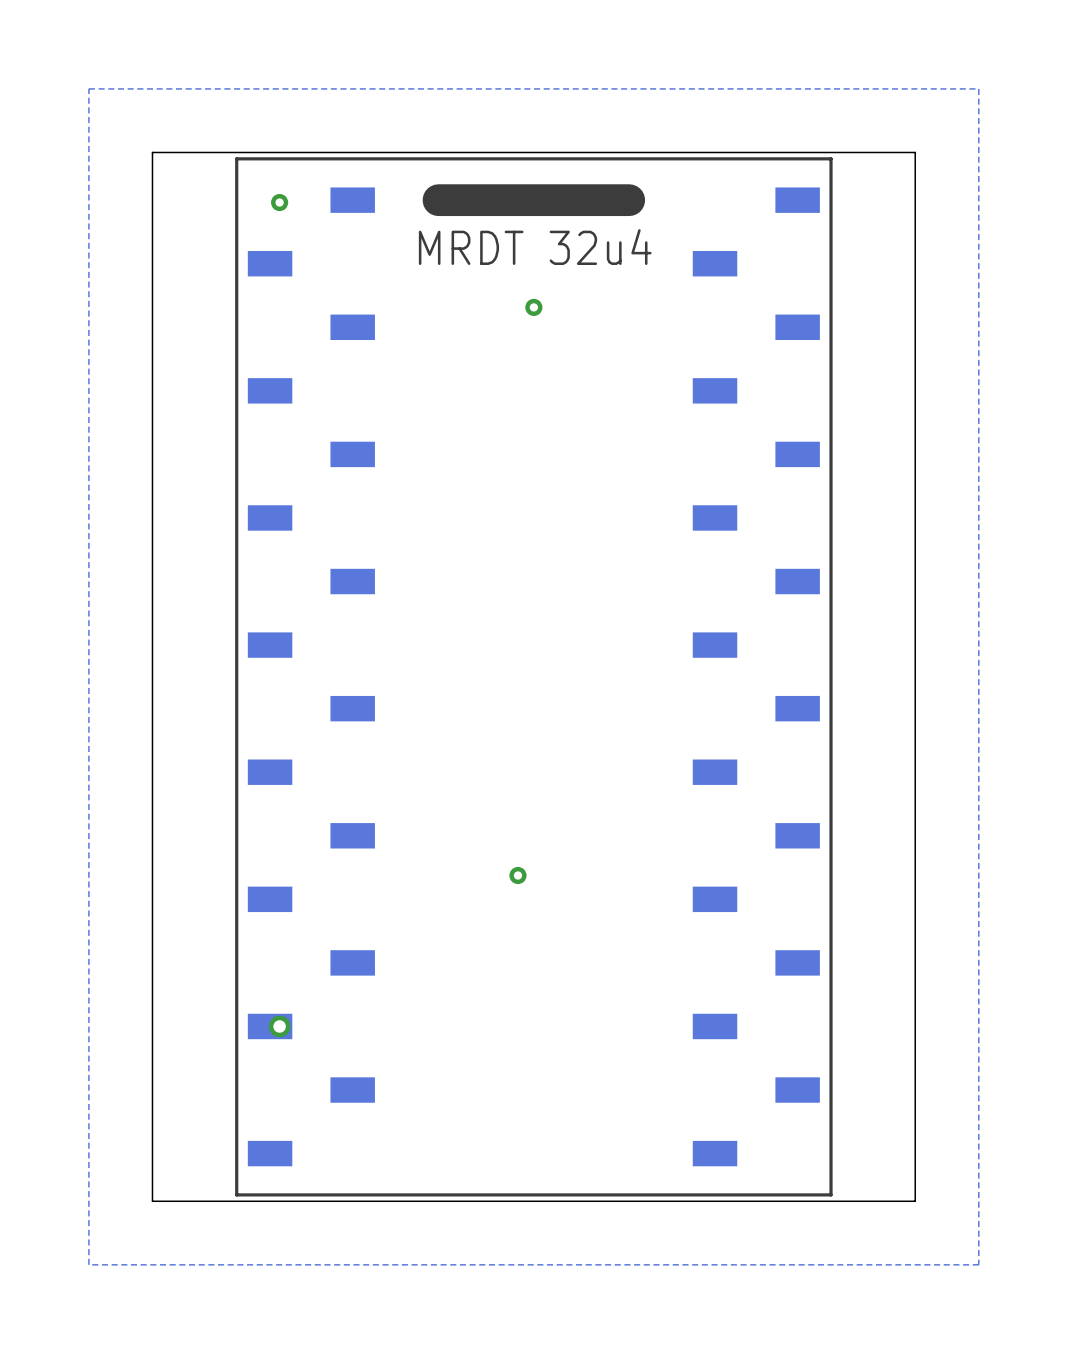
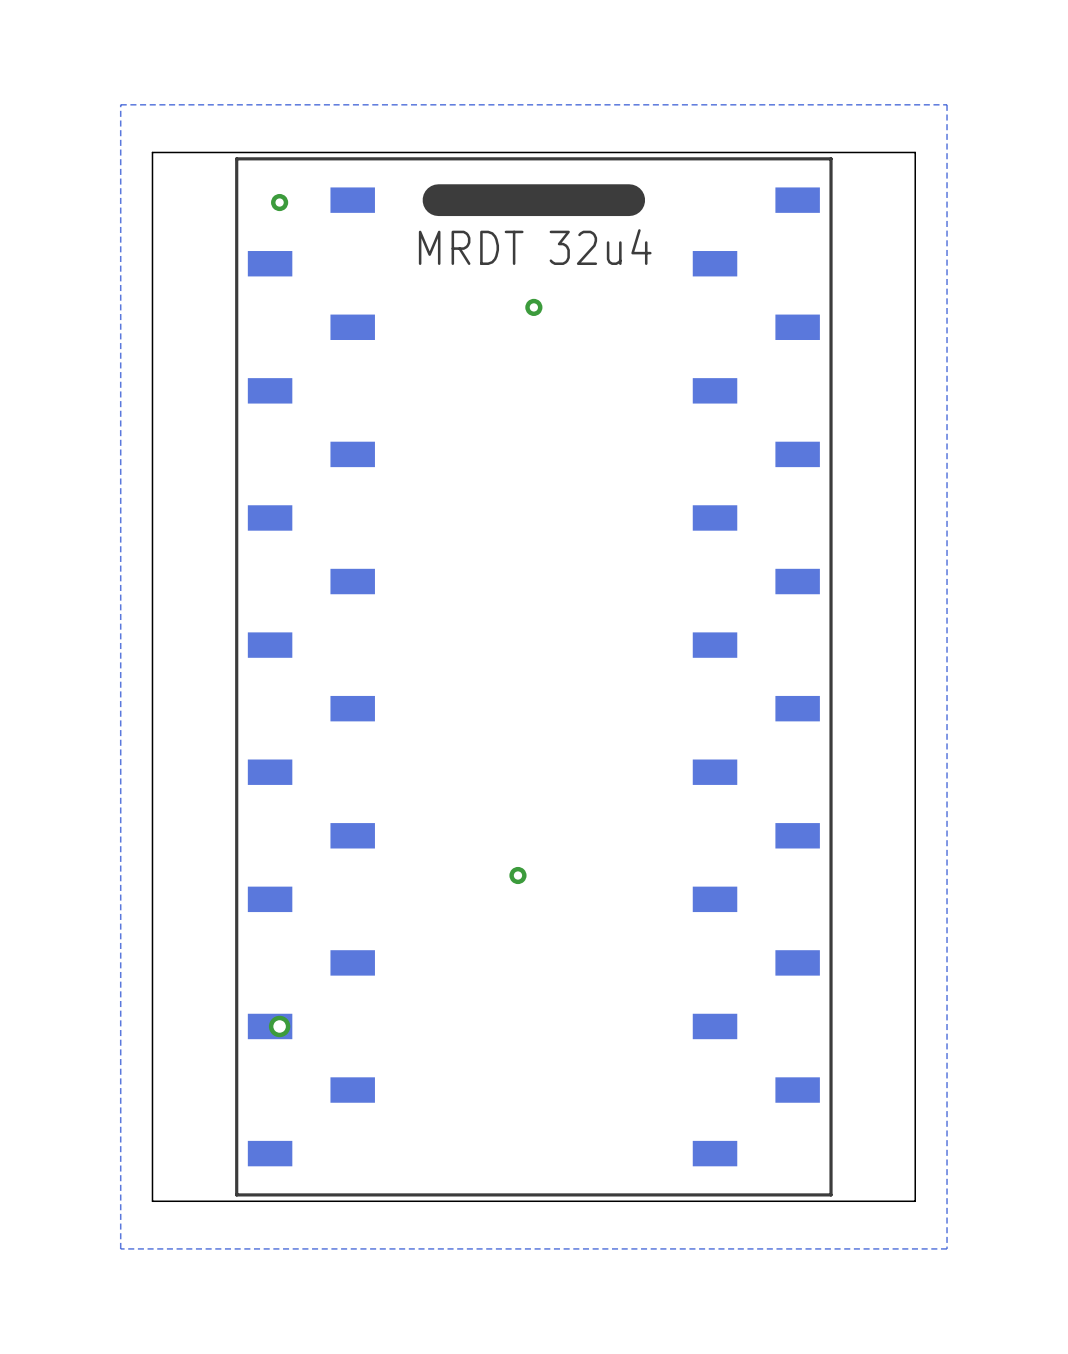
zone outline: (978, 88) (978, 1264) (88, 1264) (88, 88) (978, 88) -> (947, 104) (947, 1248) (120, 1248) (120, 104) (947, 104)

